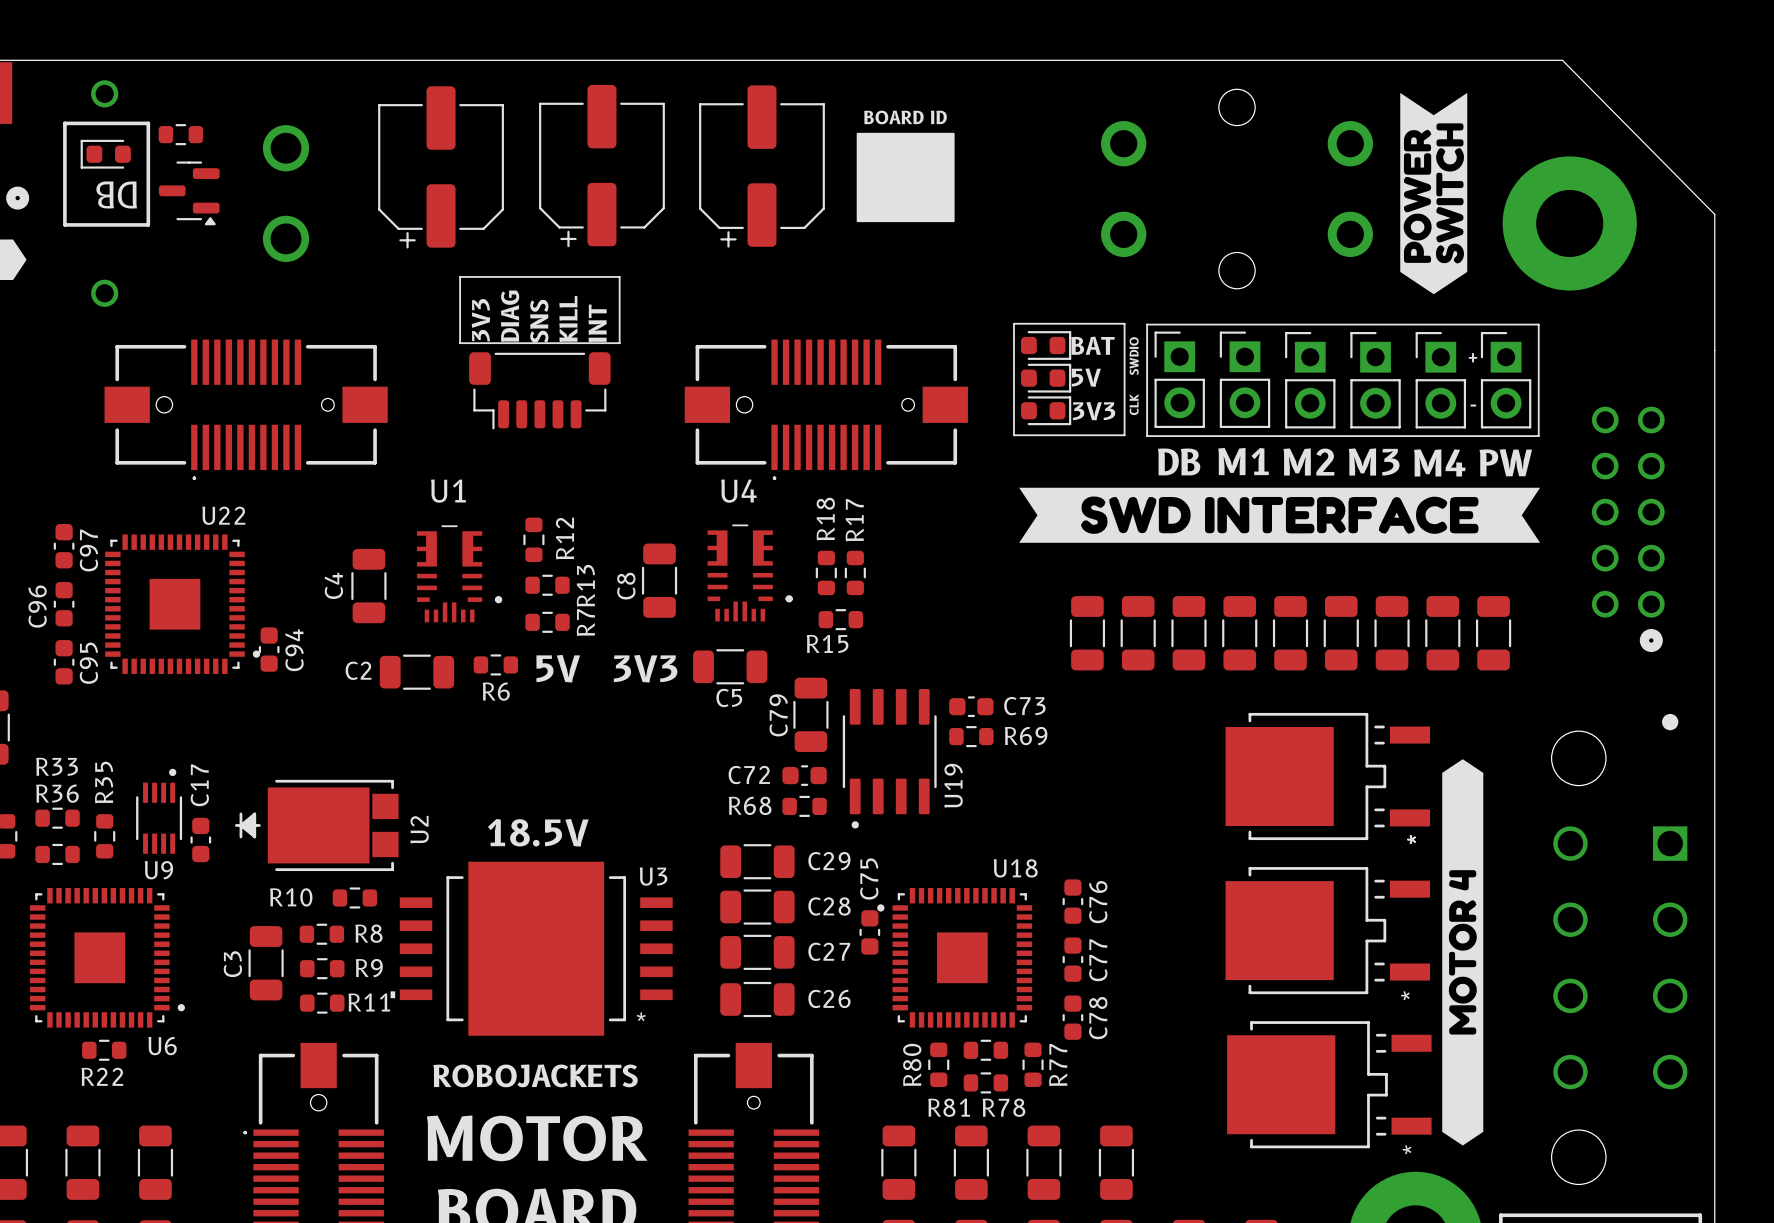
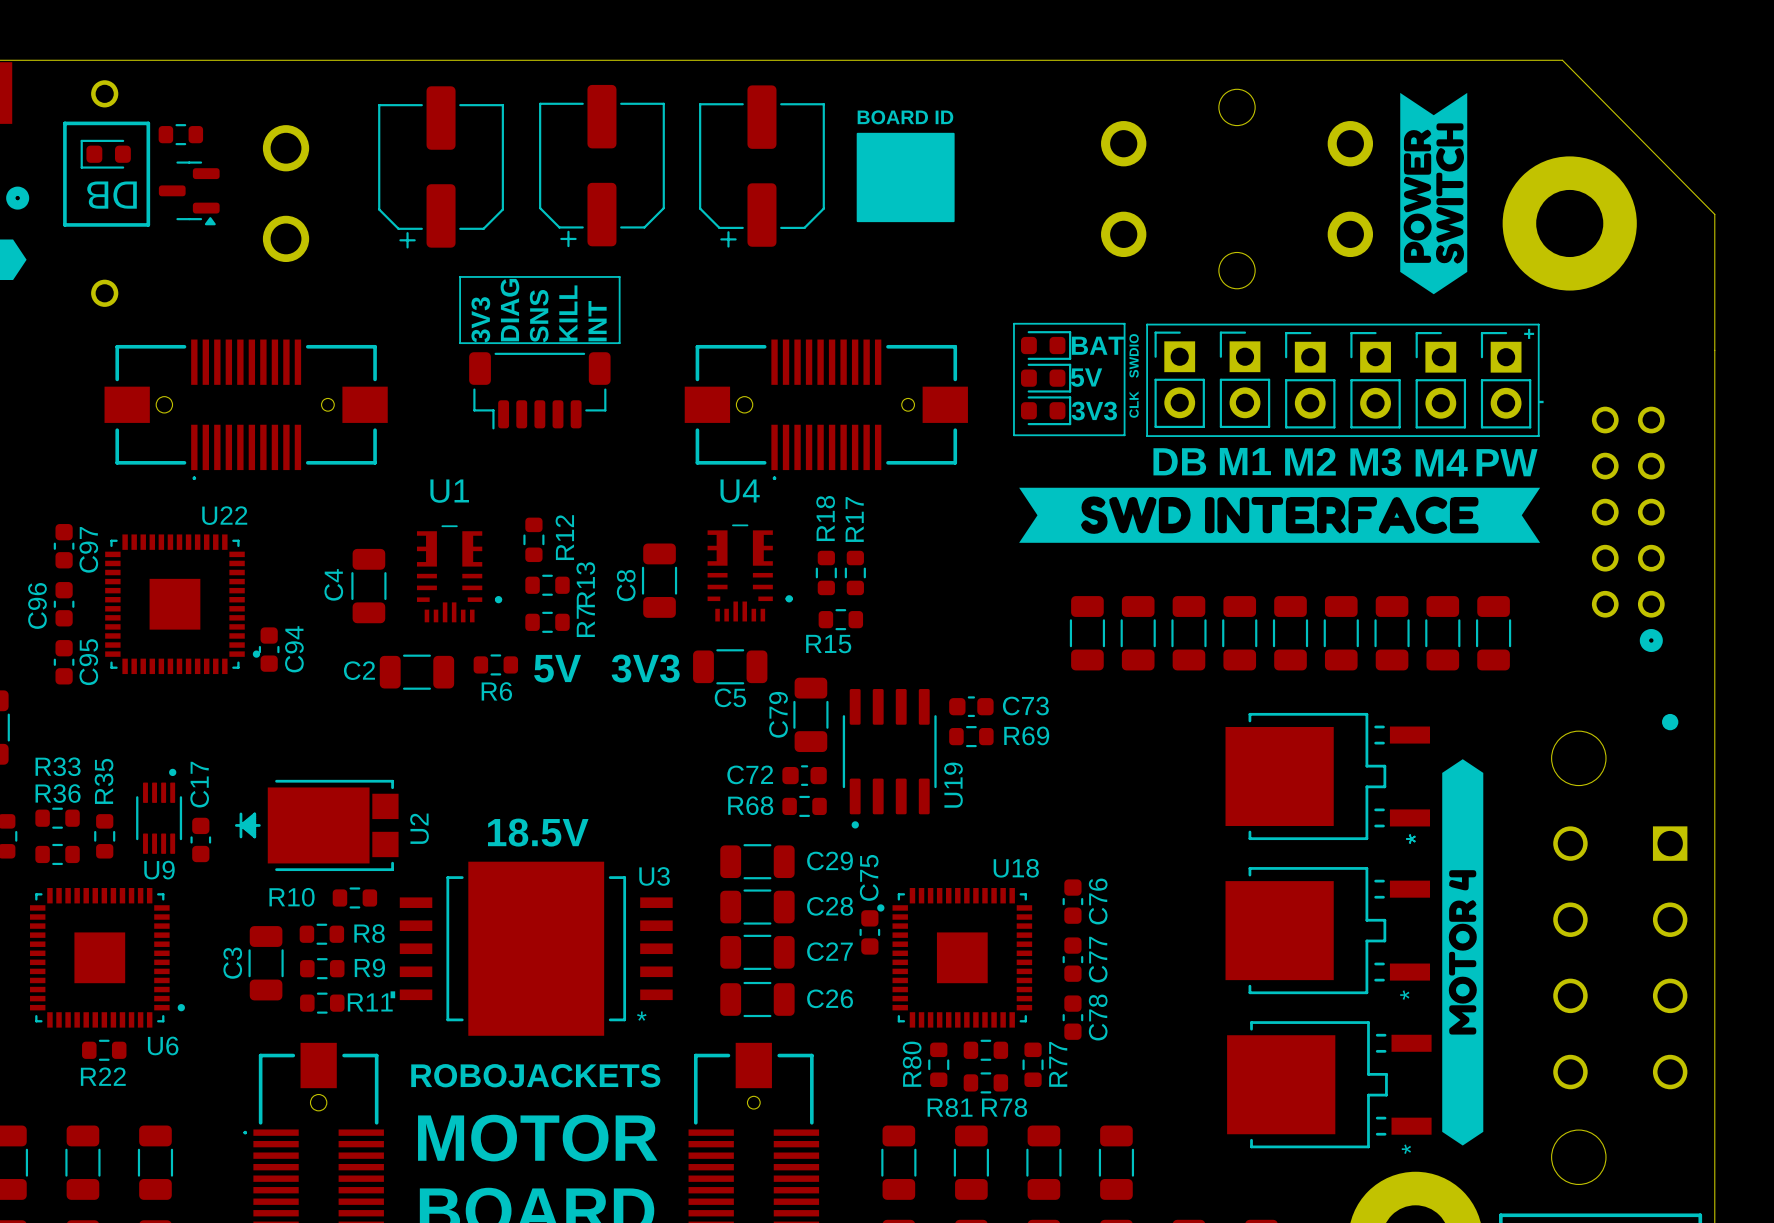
text position: + (1473, 357) -> + (1529, 333)
text position: - (1473, 405) -> - (1541, 401)

